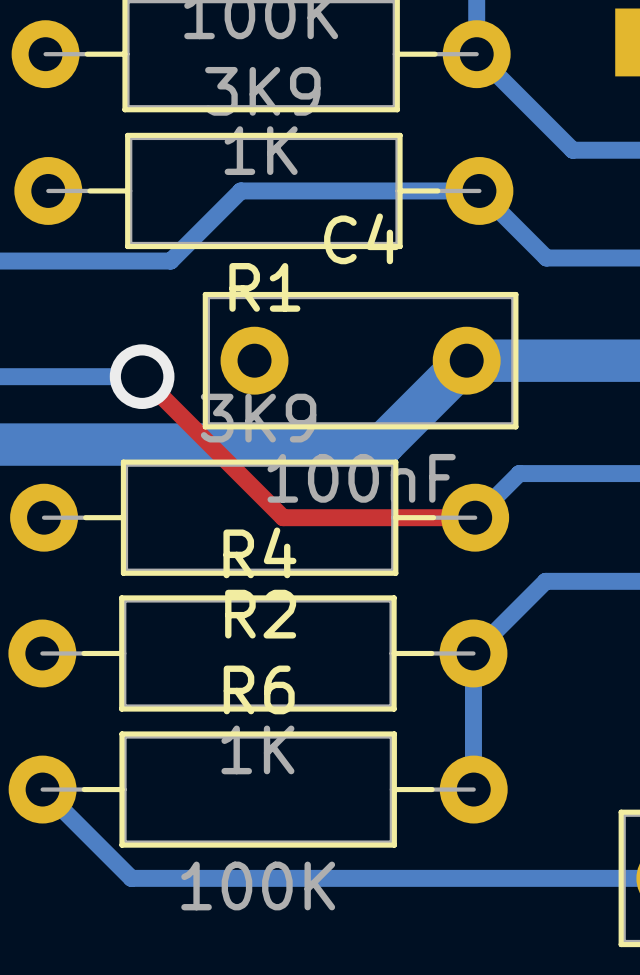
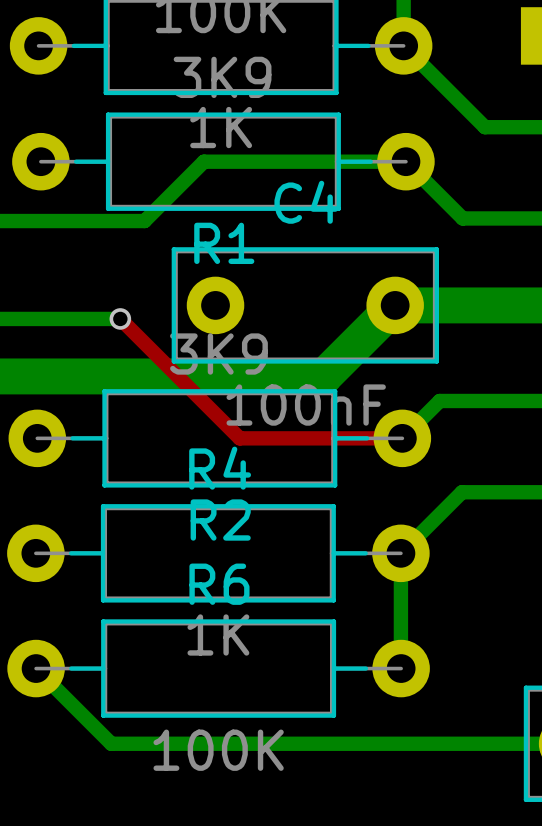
via size: [109, 344, 175, 410] -> [109, 308, 132, 330]

